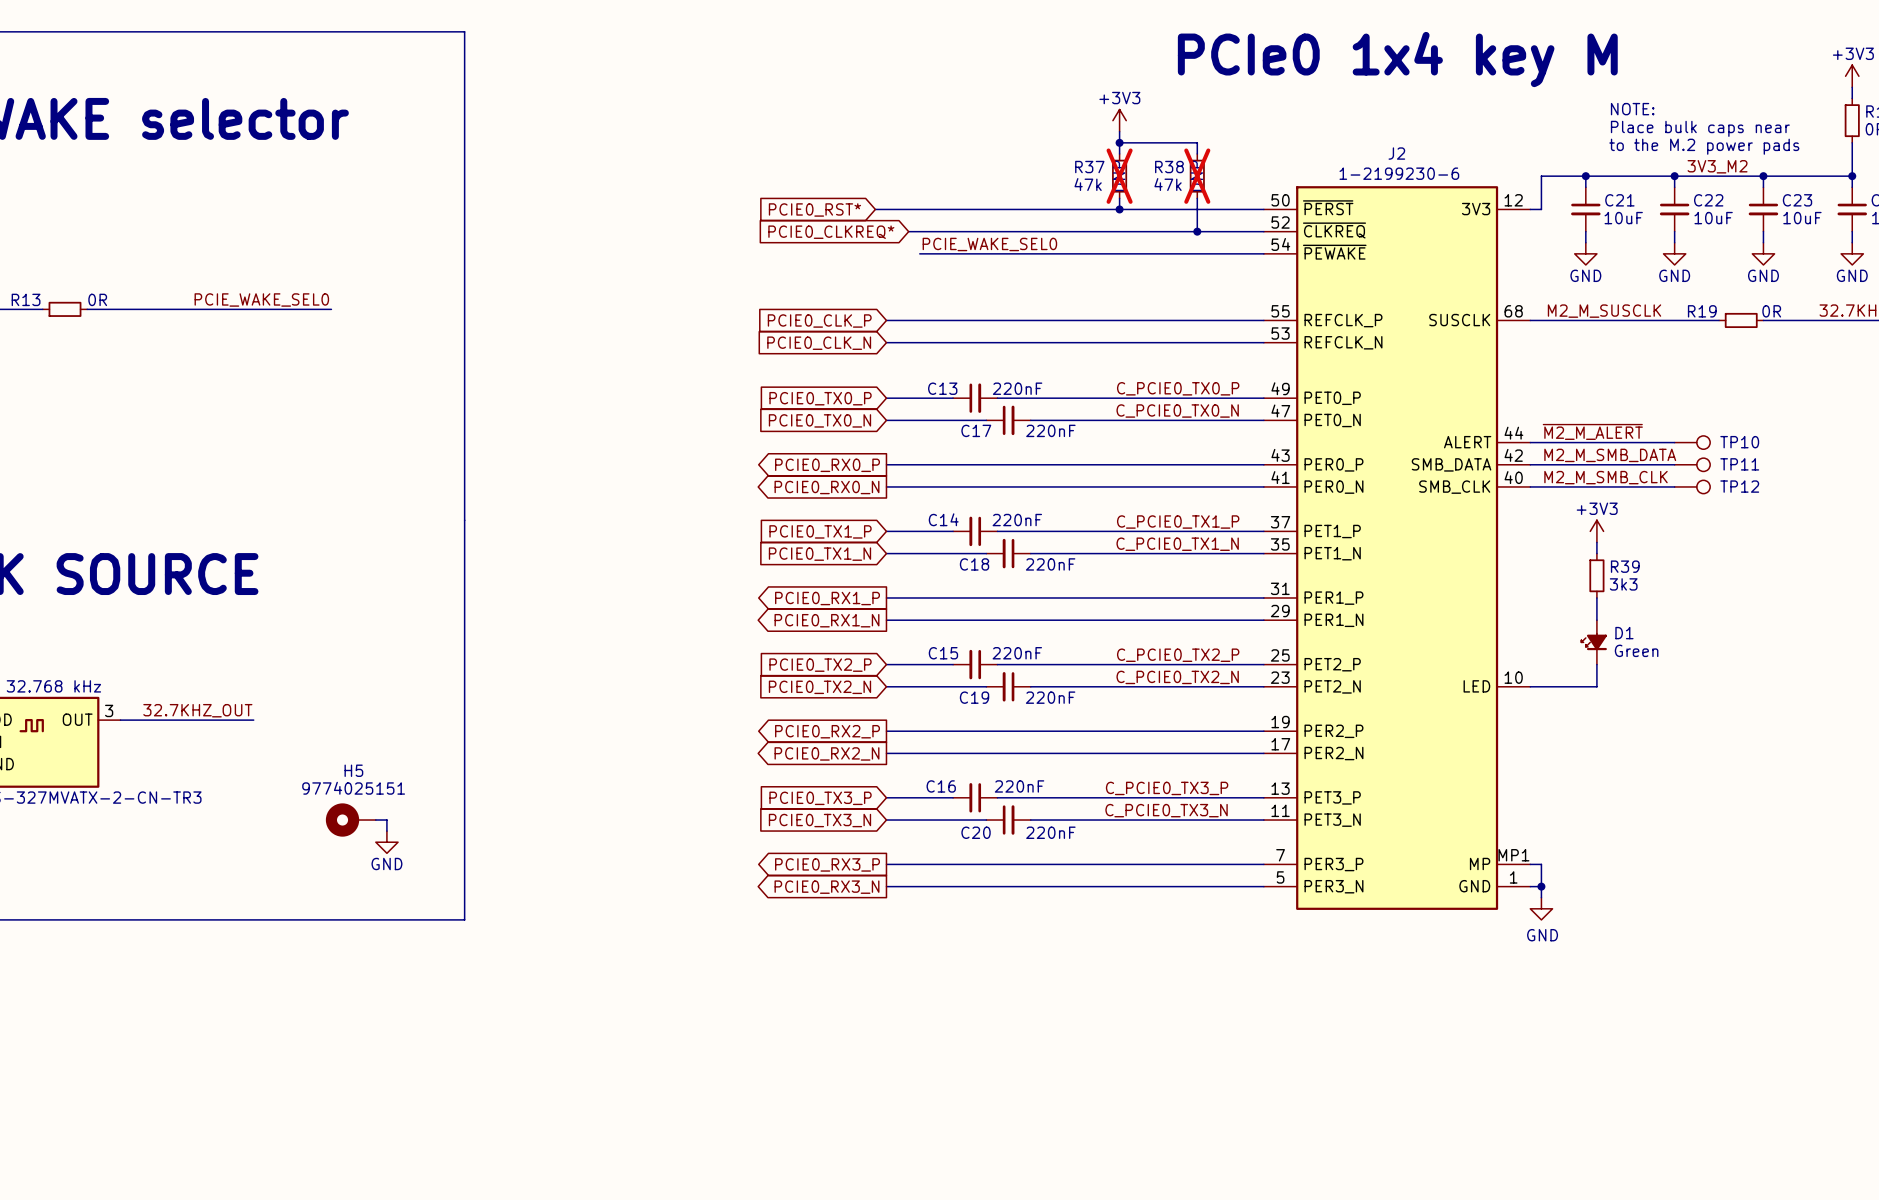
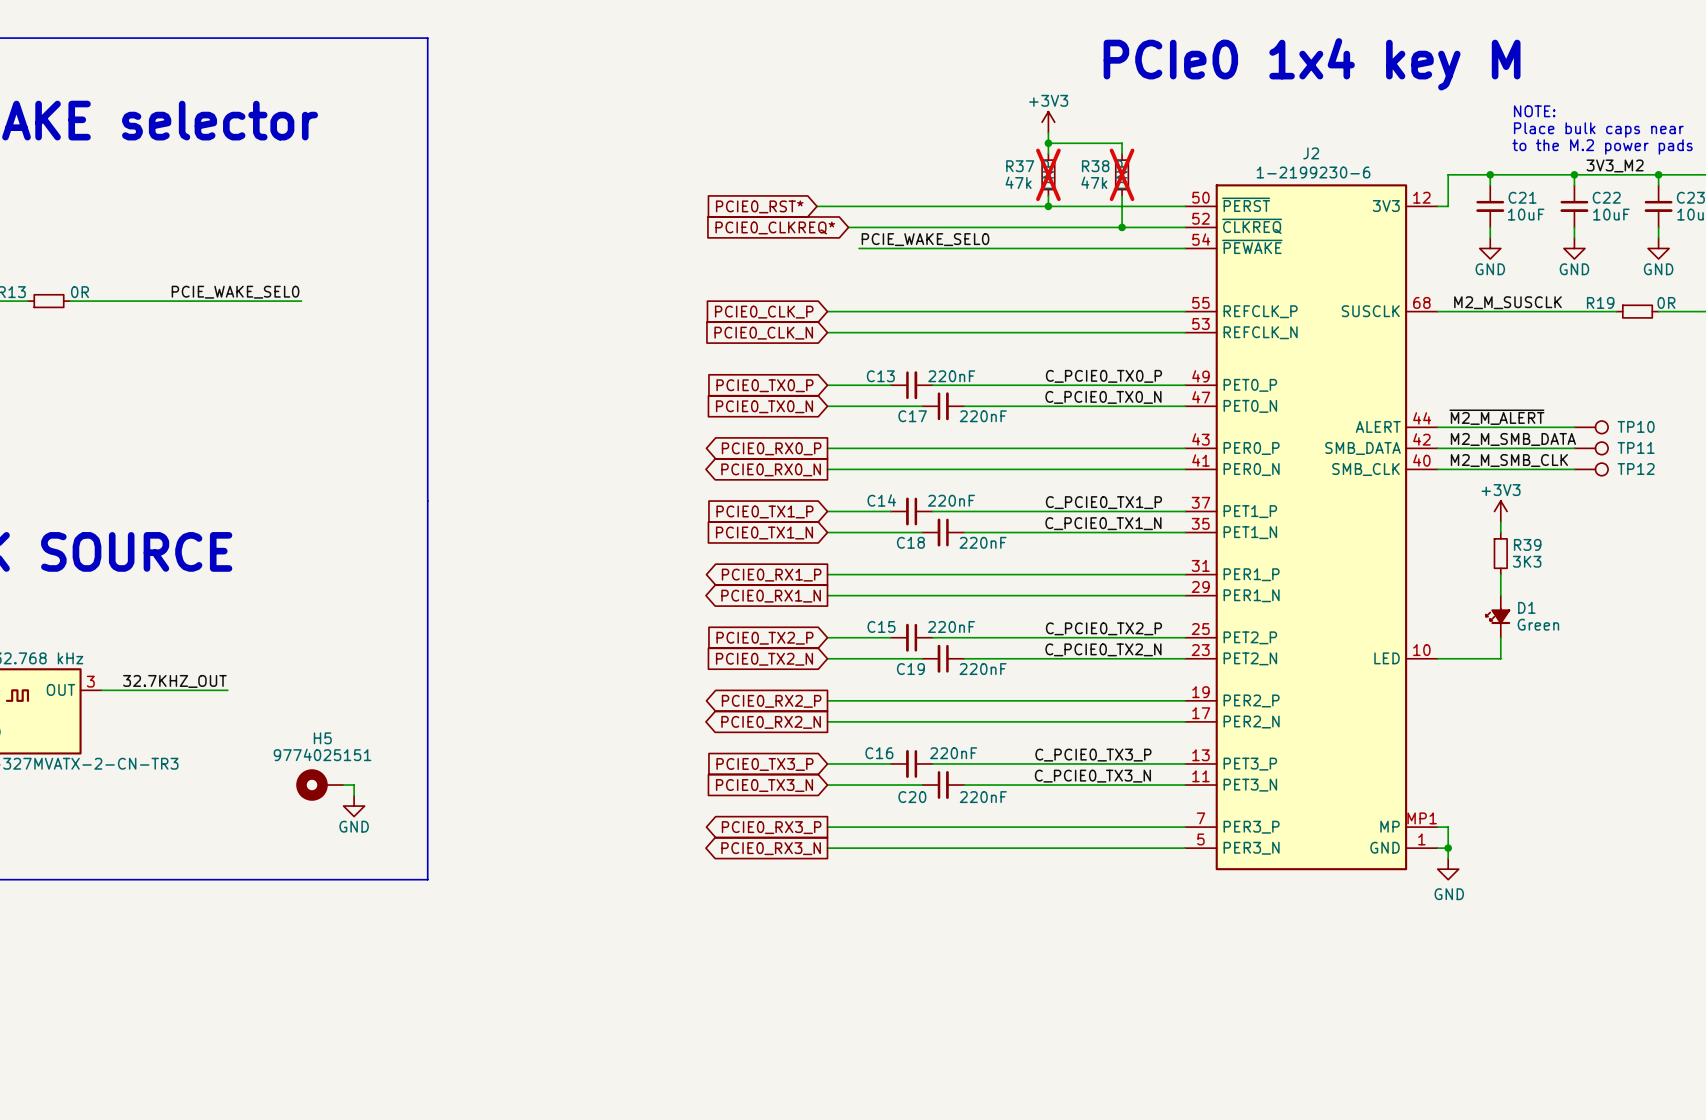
R39 value: 3k3 (1623, 584) -> 3K3 (1527, 561)

